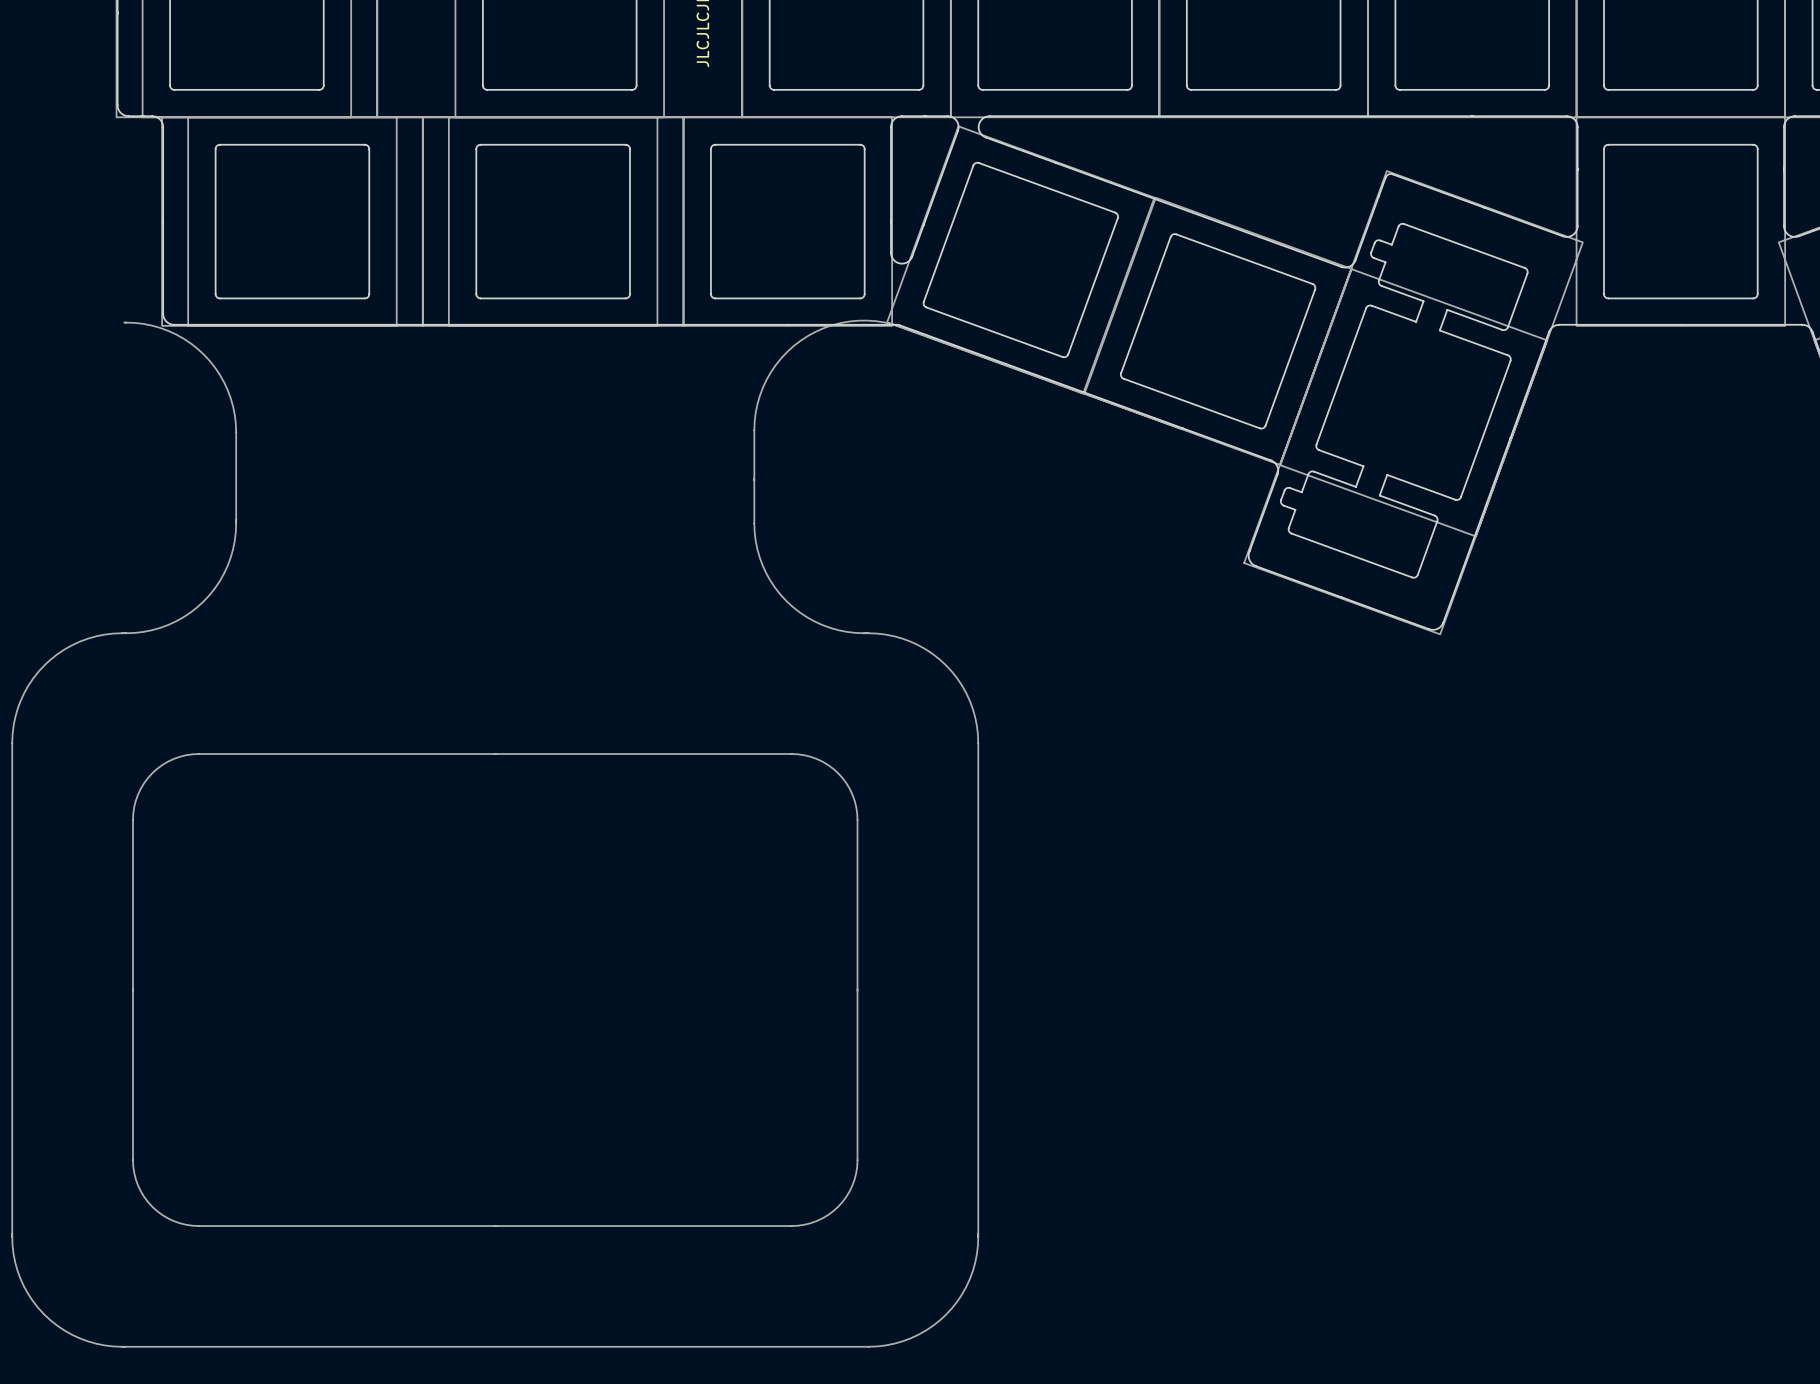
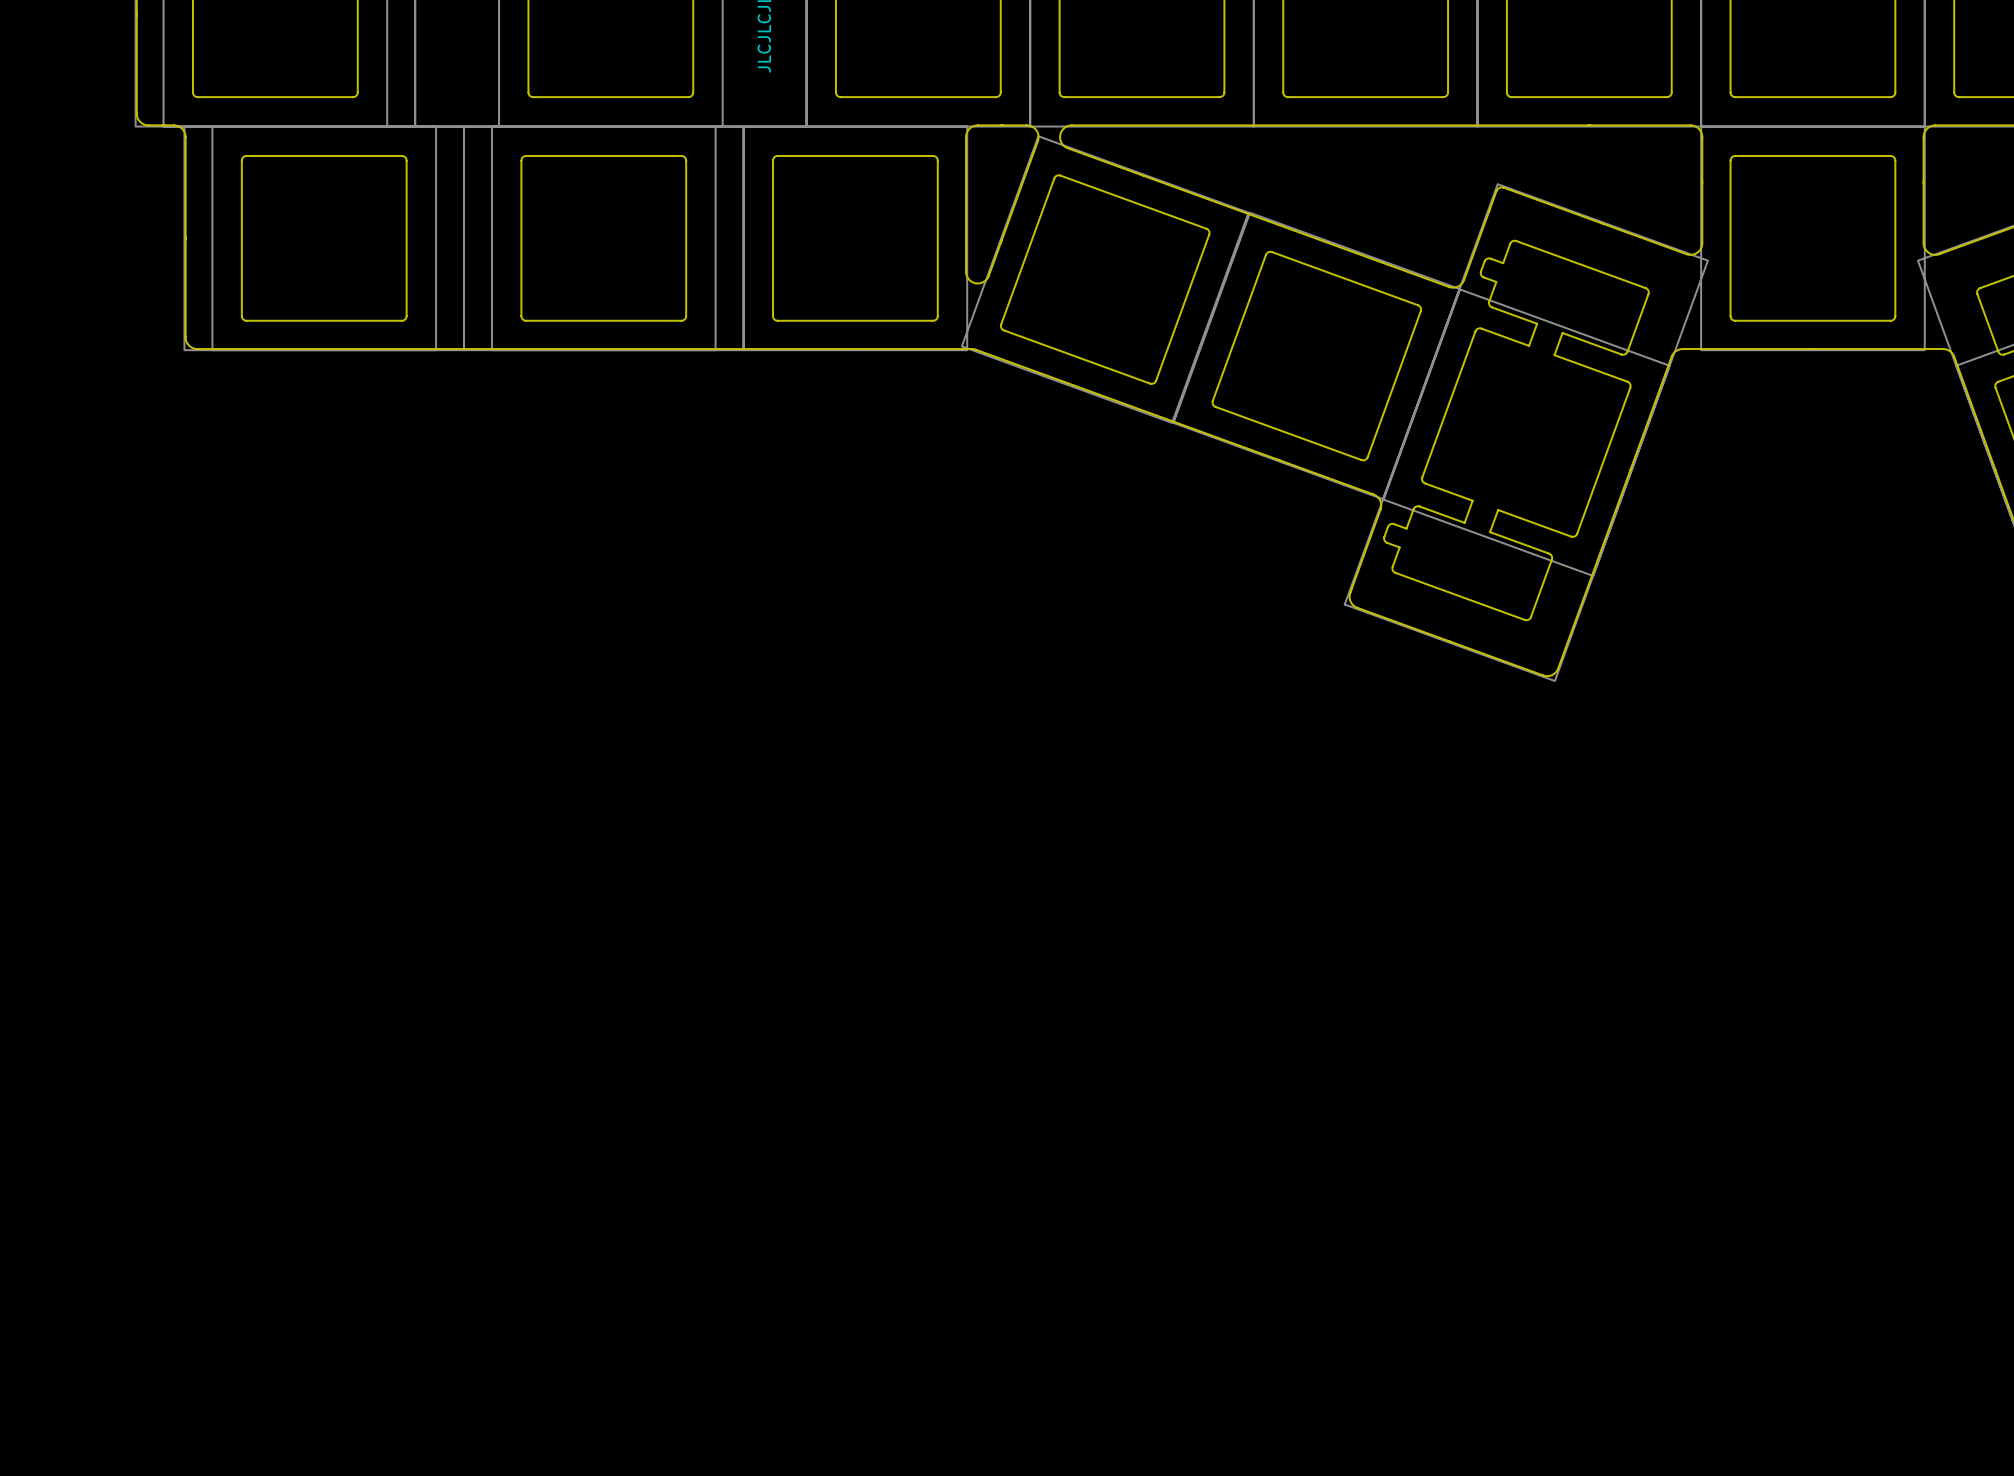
line: (124, 322) (152, 325) (183, 338) (204, 354) (224, 382) (233, 406) (235, 423) (236, 523) (234, 540) (227, 565) (215, 587) (197, 606) (183, 617) (160, 627) (143, 631) (96, 636) (64, 649) (44, 665) (28, 685) (17, 709) (13, 725) (13, 1254) (17, 1270) (28, 1294) (50, 1320) (80, 1338) (113, 1346) (868, 1346) (894, 1343) (910, 1338) (939, 1320) (951, 1308) (966, 1286) (975, 1262) (977, 1245) (978, 743) (975, 717) (969, 701) (957, 678) (946, 665) (925, 649) (894, 636) (846, 631) (822, 624) (799, 612) (775, 587) (762, 565) (754, 532) (754, 430) (757, 404) (771, 371) (794, 345) (816, 331) (832, 325) (867, 320) (901, 327) (1182, 429) -> none
line: (198, 753) (791, 753) (810, 756) (828, 765) (842, 778) (849, 788) (854, 800) (857, 819) (857, 1160) (854, 1179) (846, 1196) (833, 1211) (822, 1218) (810, 1223) (791, 1226) (198, 1226) (179, 1223) (162, 1214) (144, 1196) (135, 1179) (133, 1166) (133, 813) (140, 788) (157, 768) (179, 756) (198, 753) -> none

